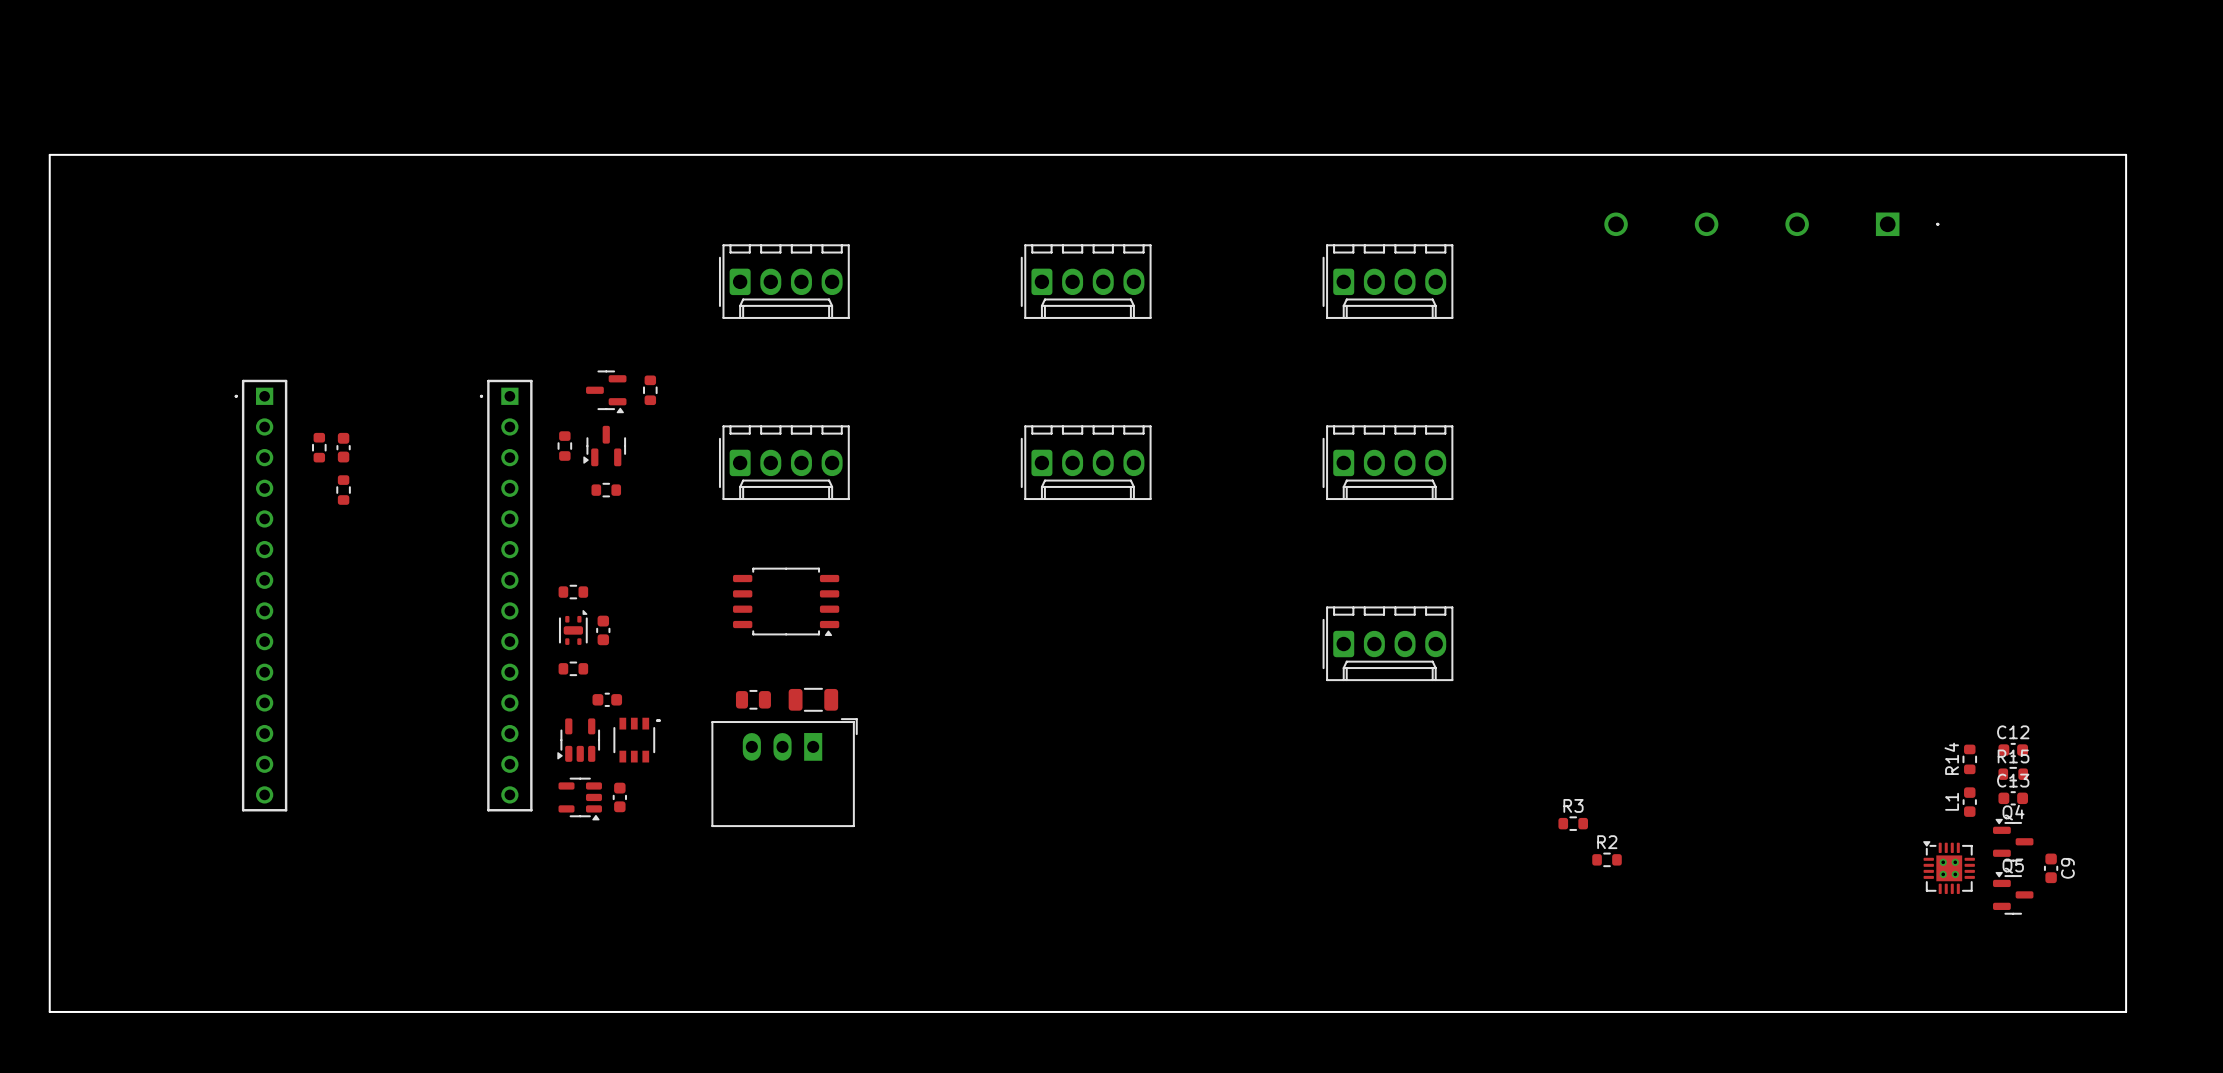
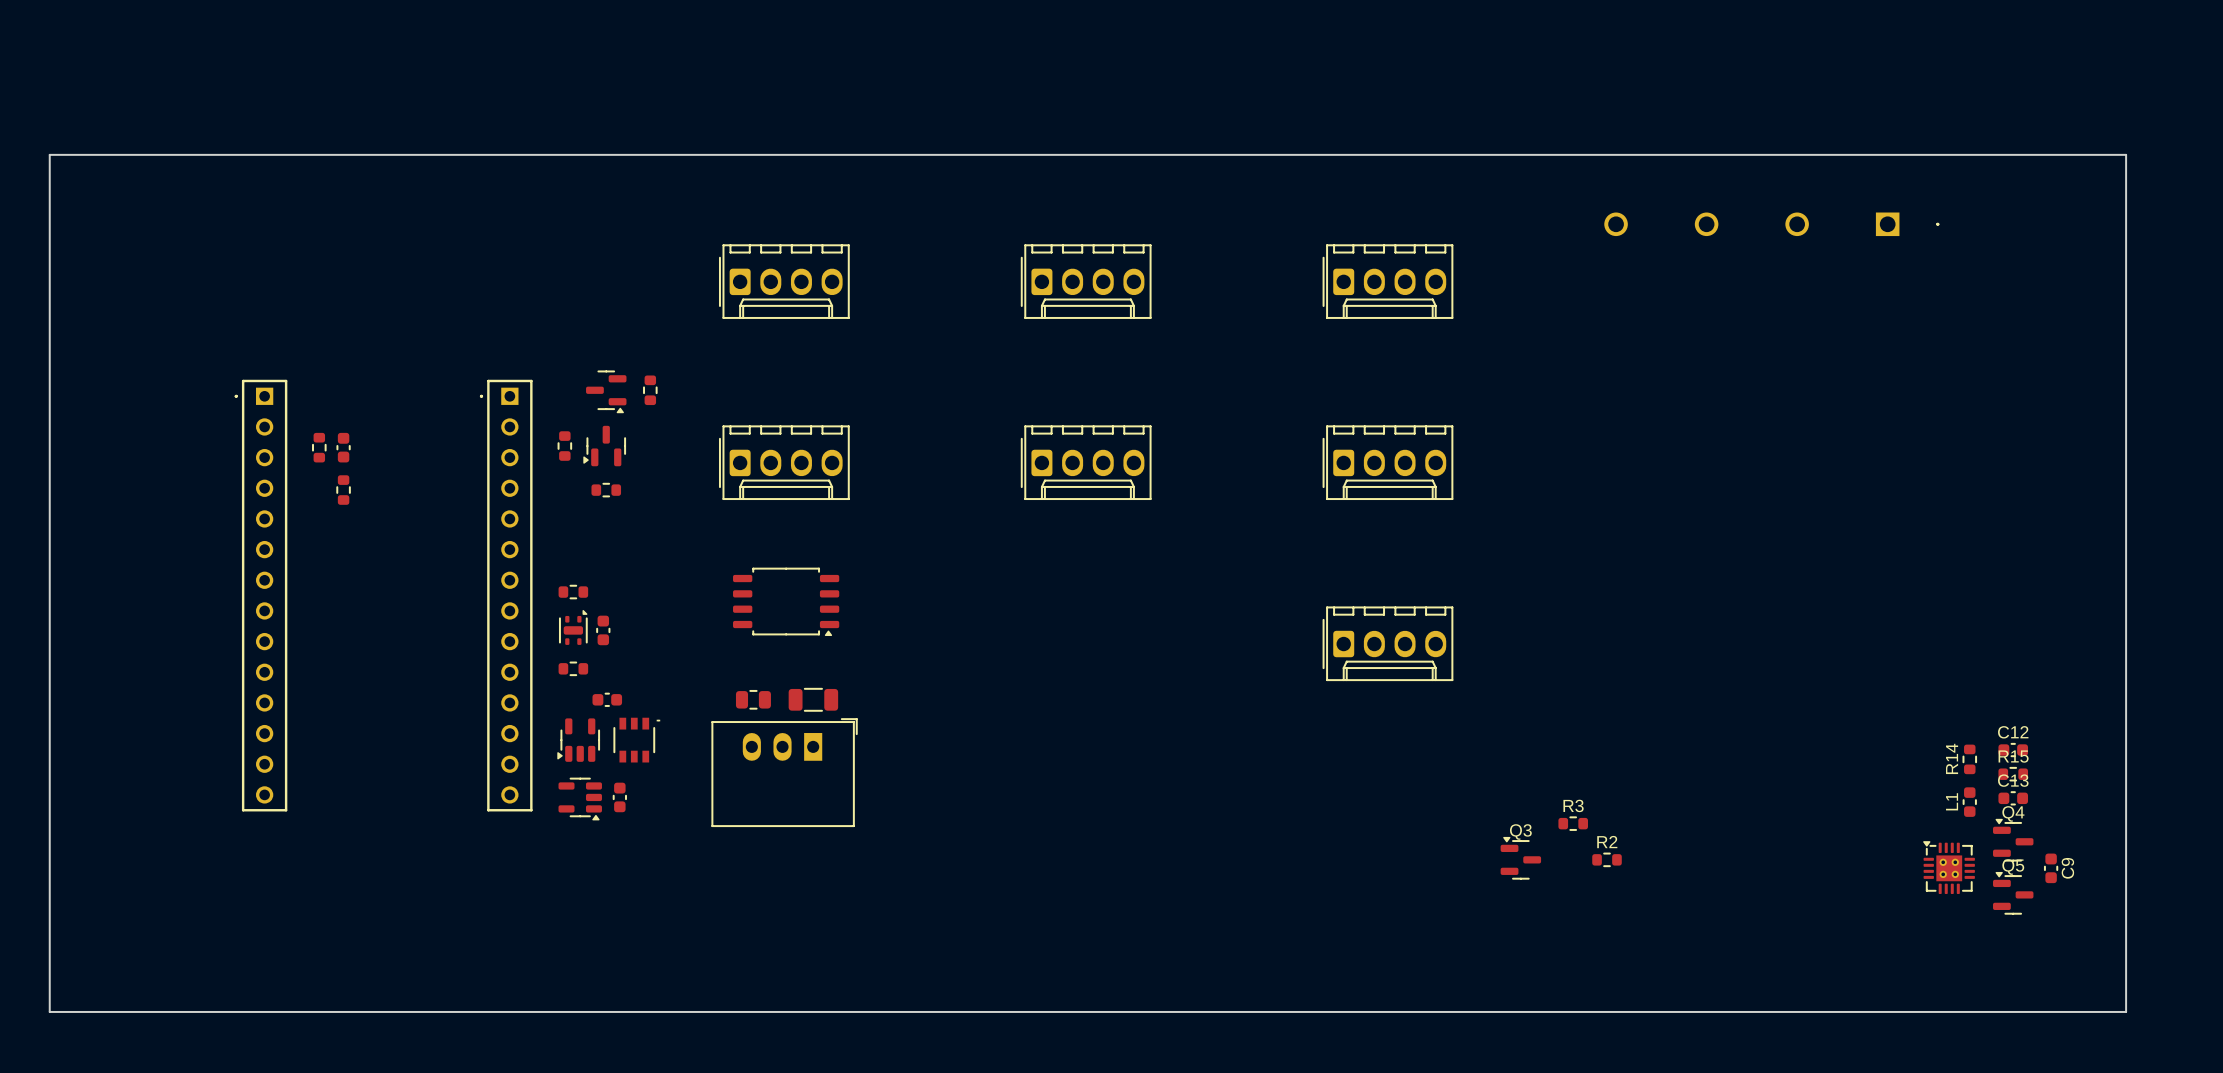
Q3: none -> (1520, 858)

